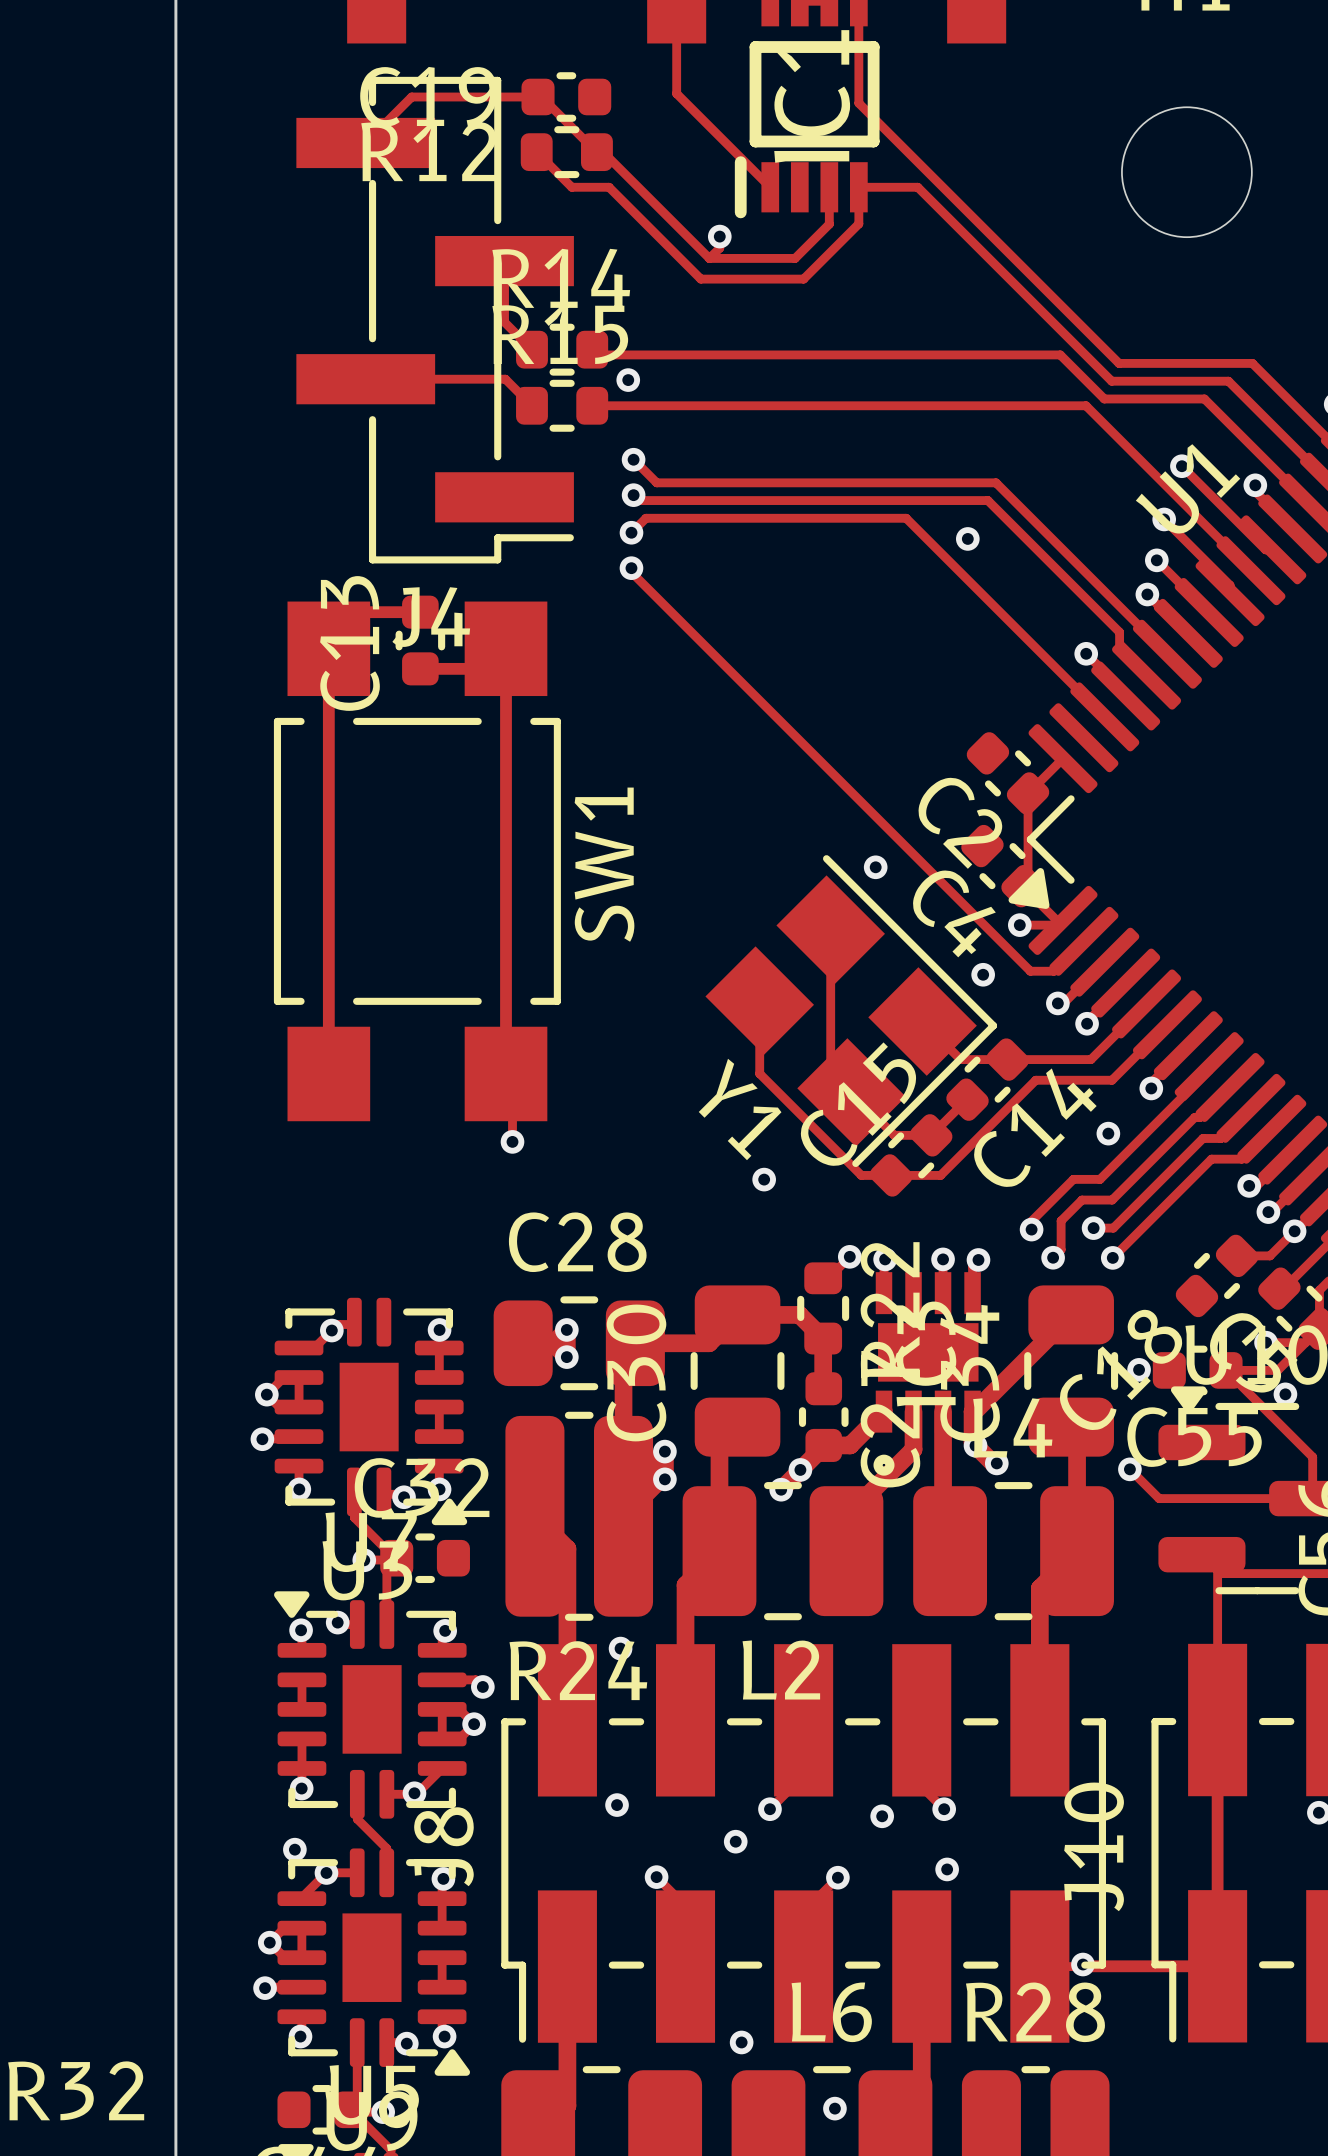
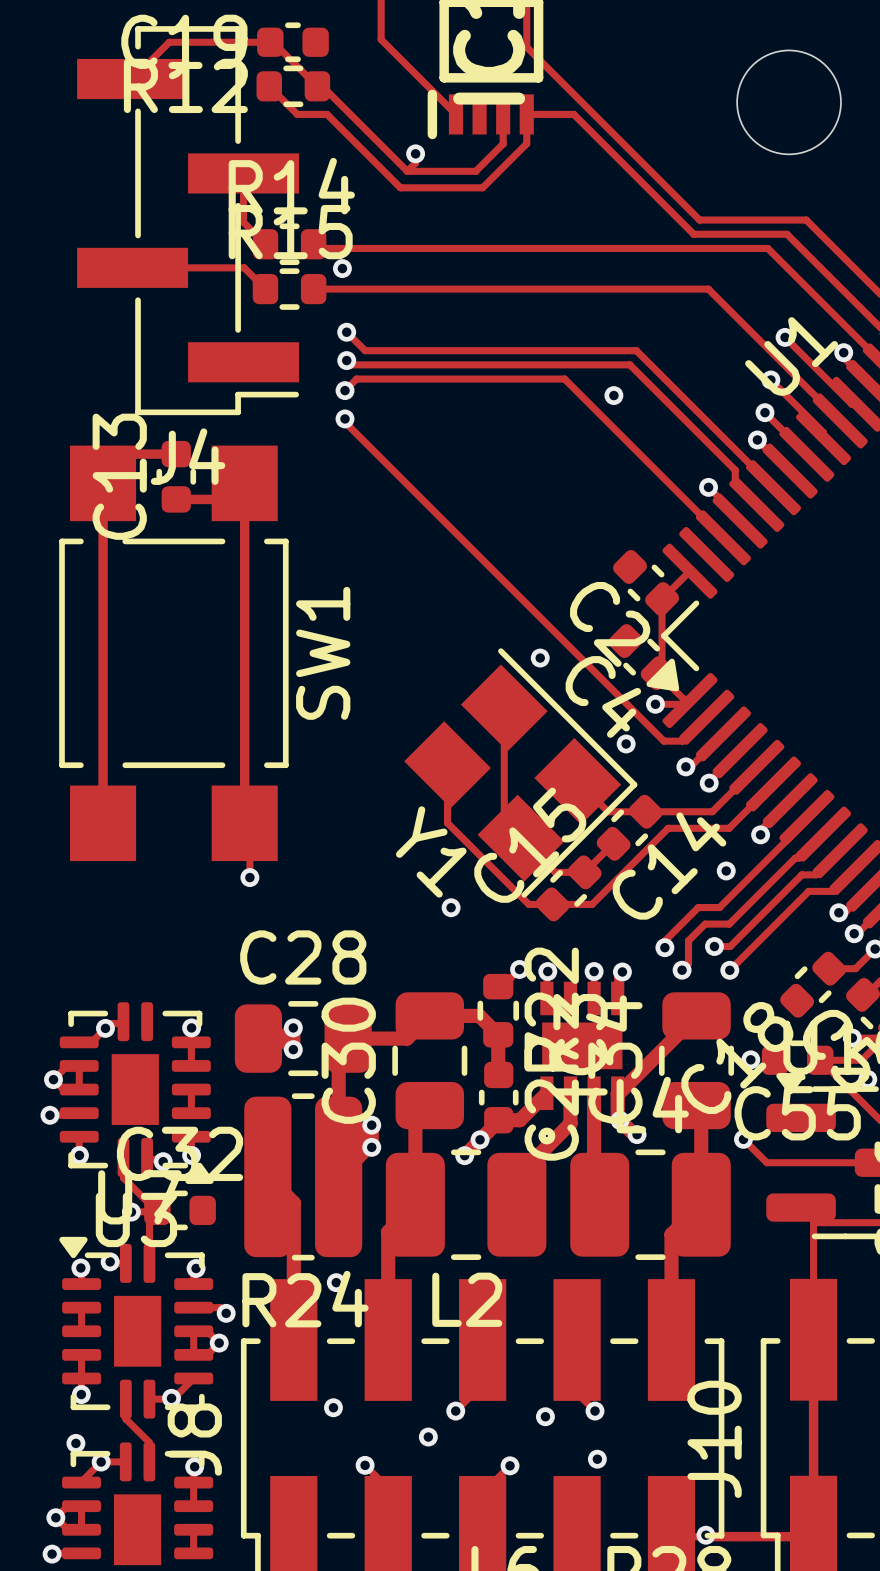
track: (1075, 319) (1119, 363) (1252, 363) -> (699, 220) (806, 220) (841, 255)
track: (1067, 337) (1111, 381) (1228, 381) -> (693, 234) (787, 234) (822, 269)
track: (1060, 354) (1104, 398) (1204, 398) -> (687, 248) (767, 248) (803, 283)

